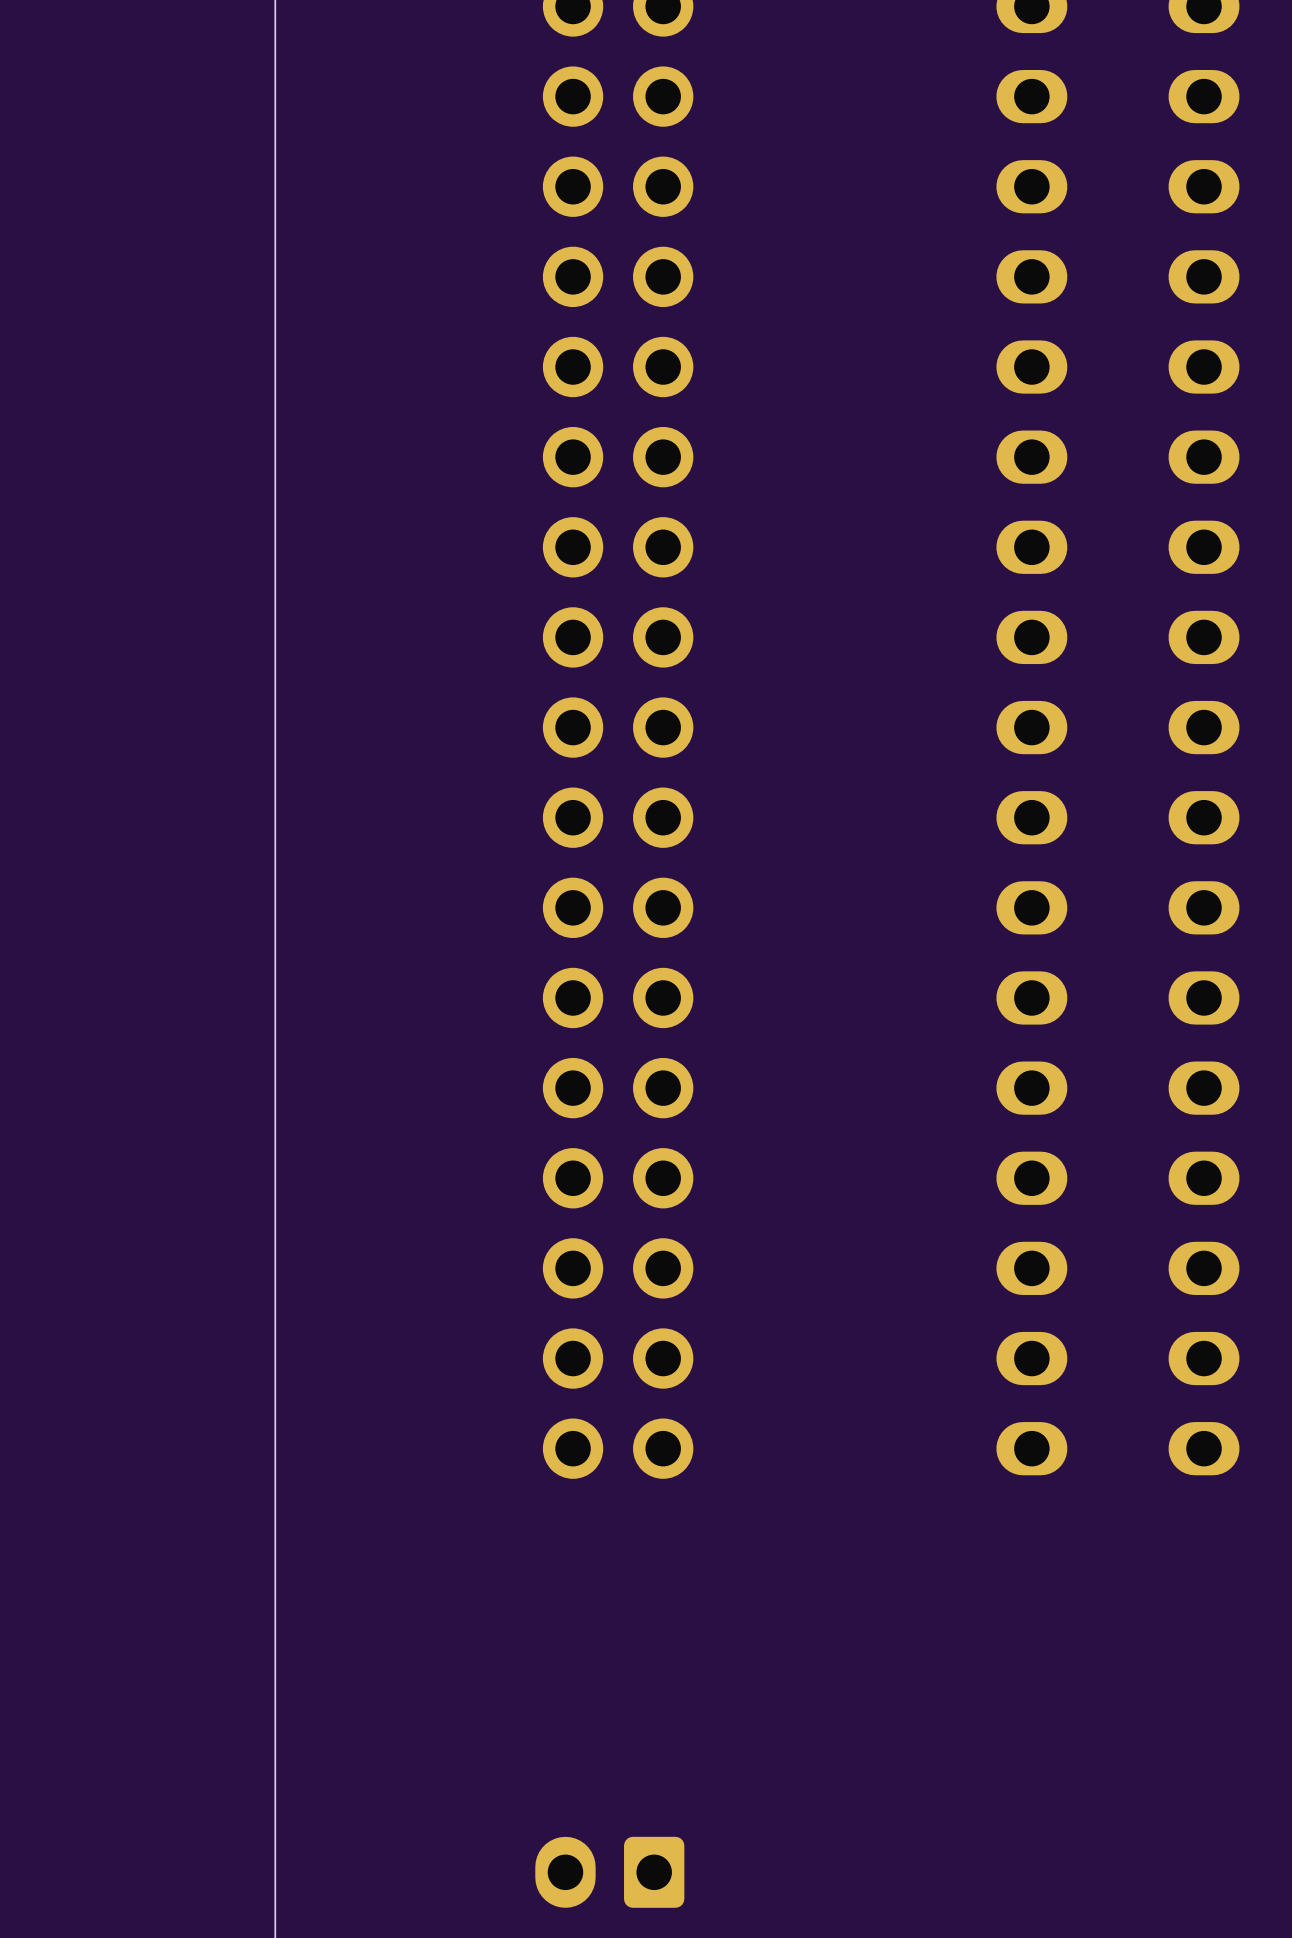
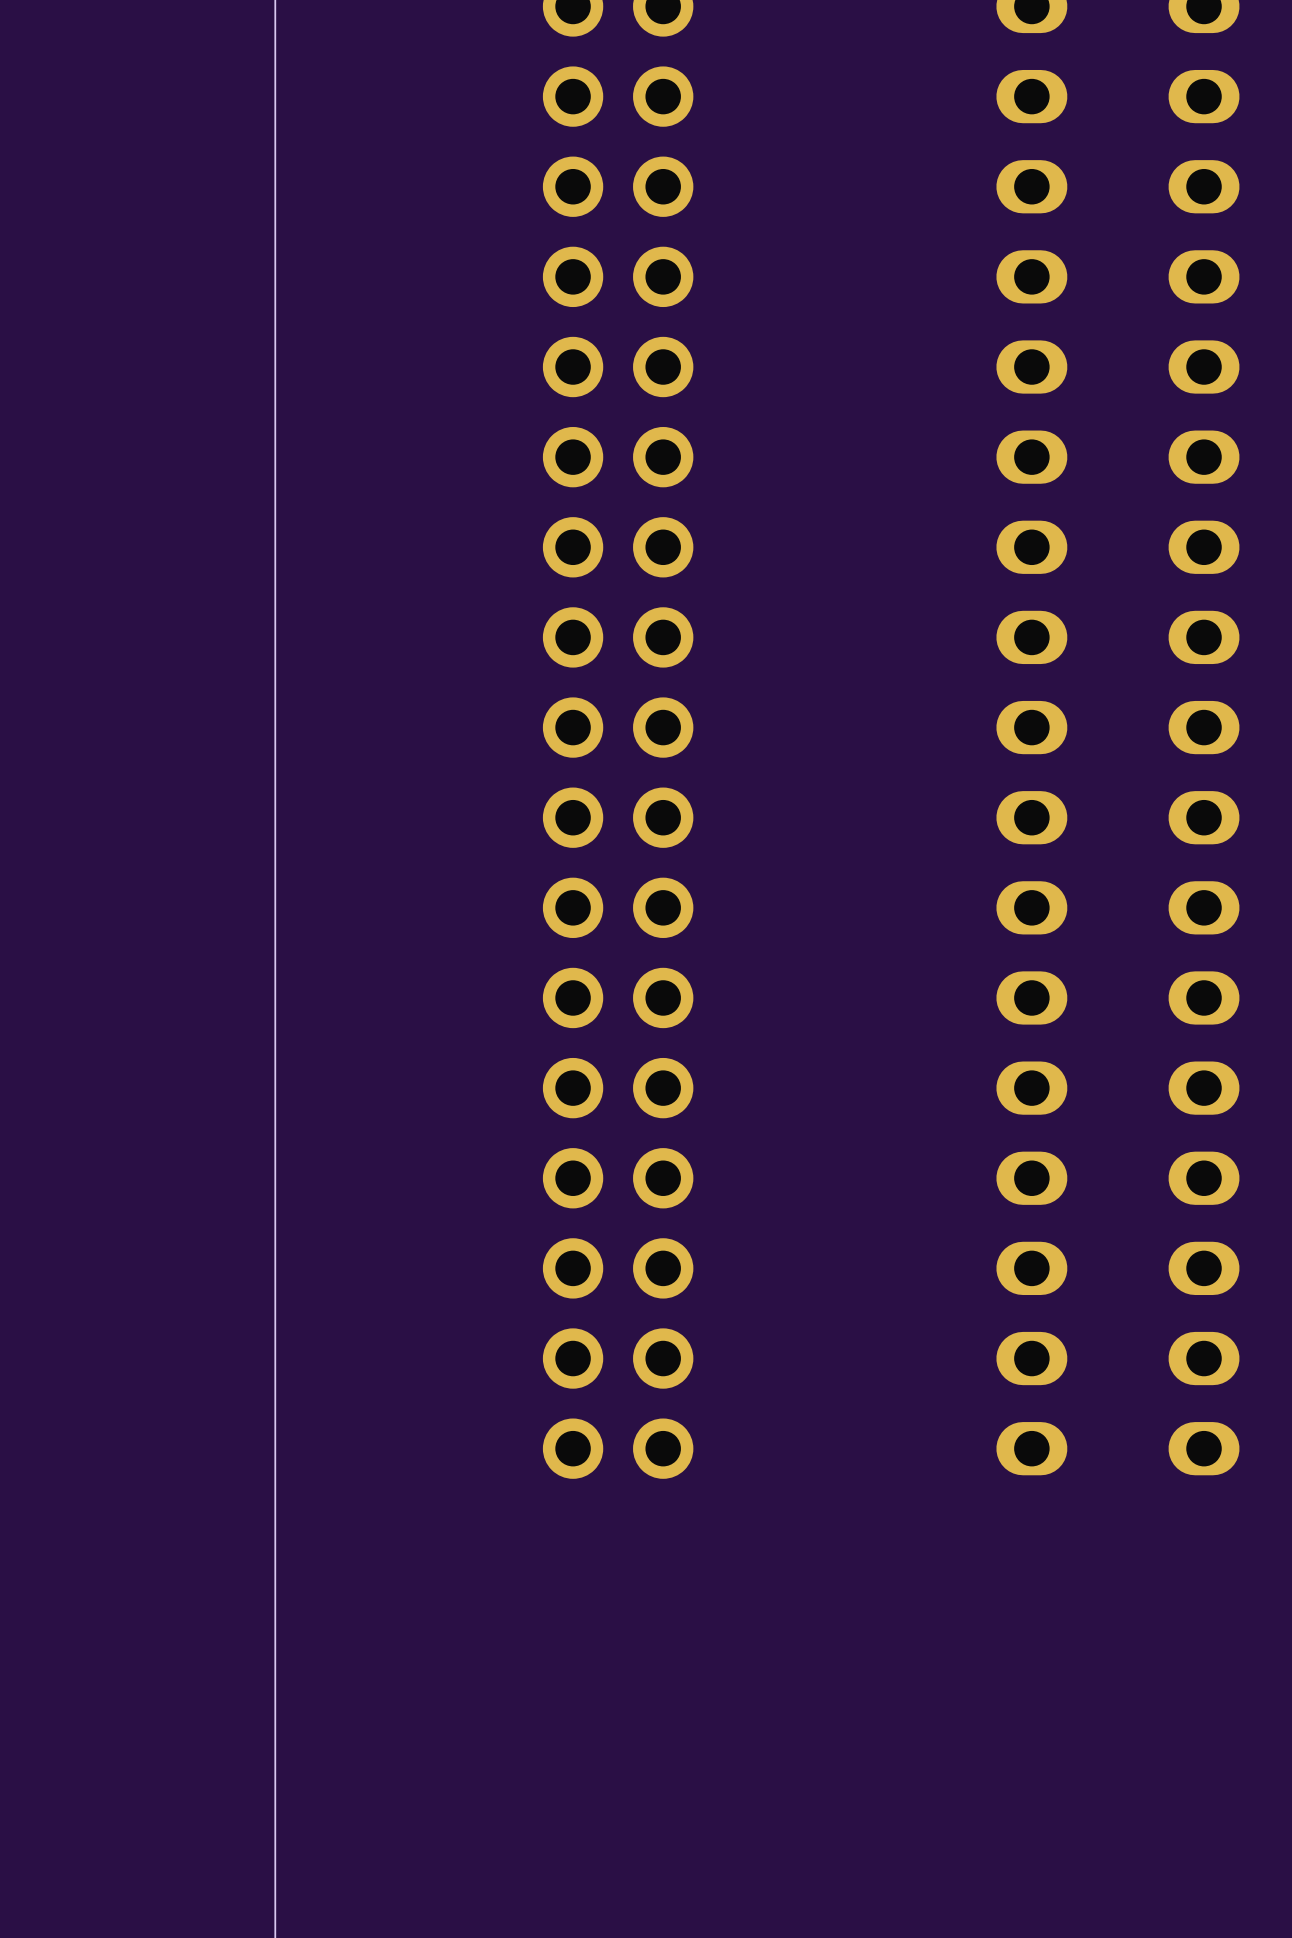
part: (609, 1872) -> none

